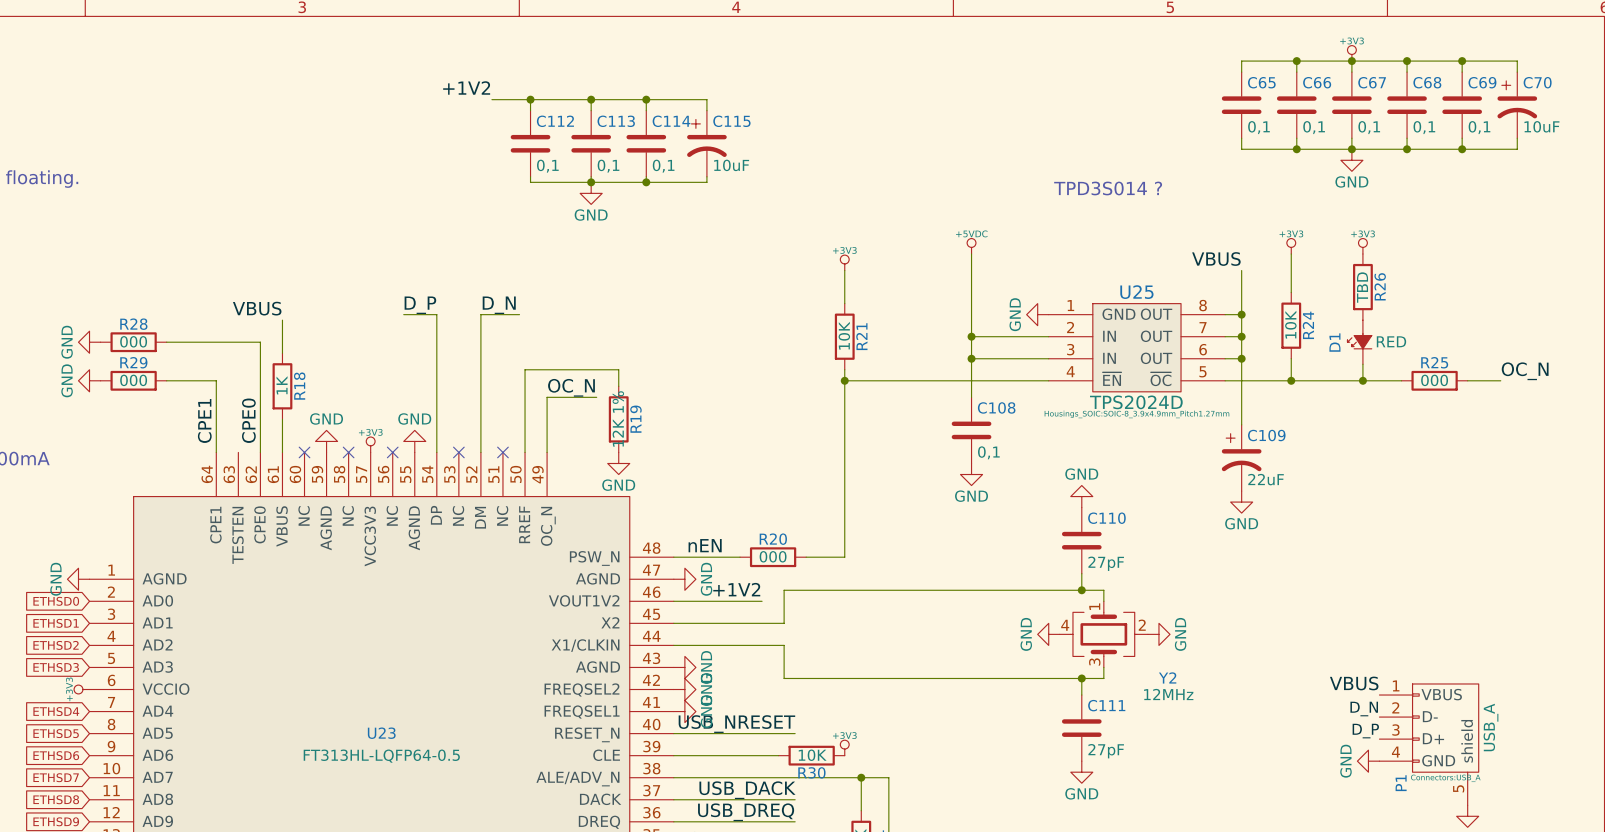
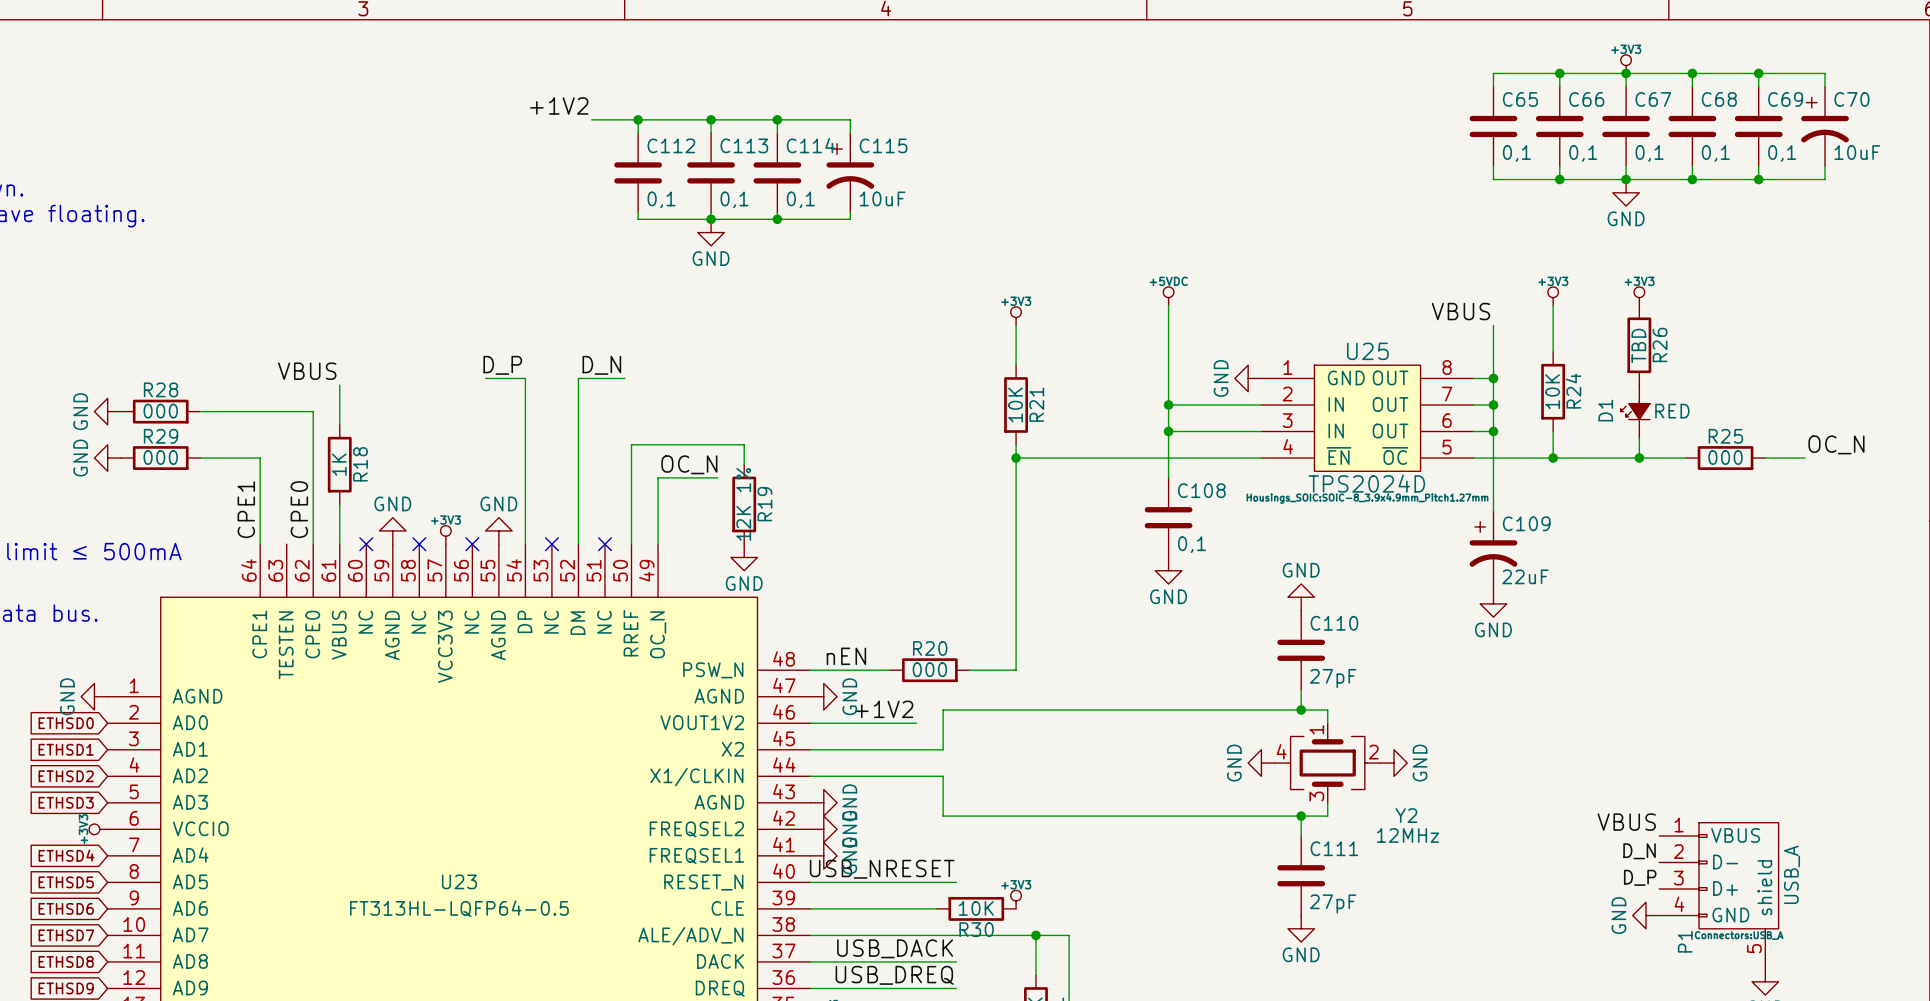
text: TPD3S014 ? (1108, 188) -> none

